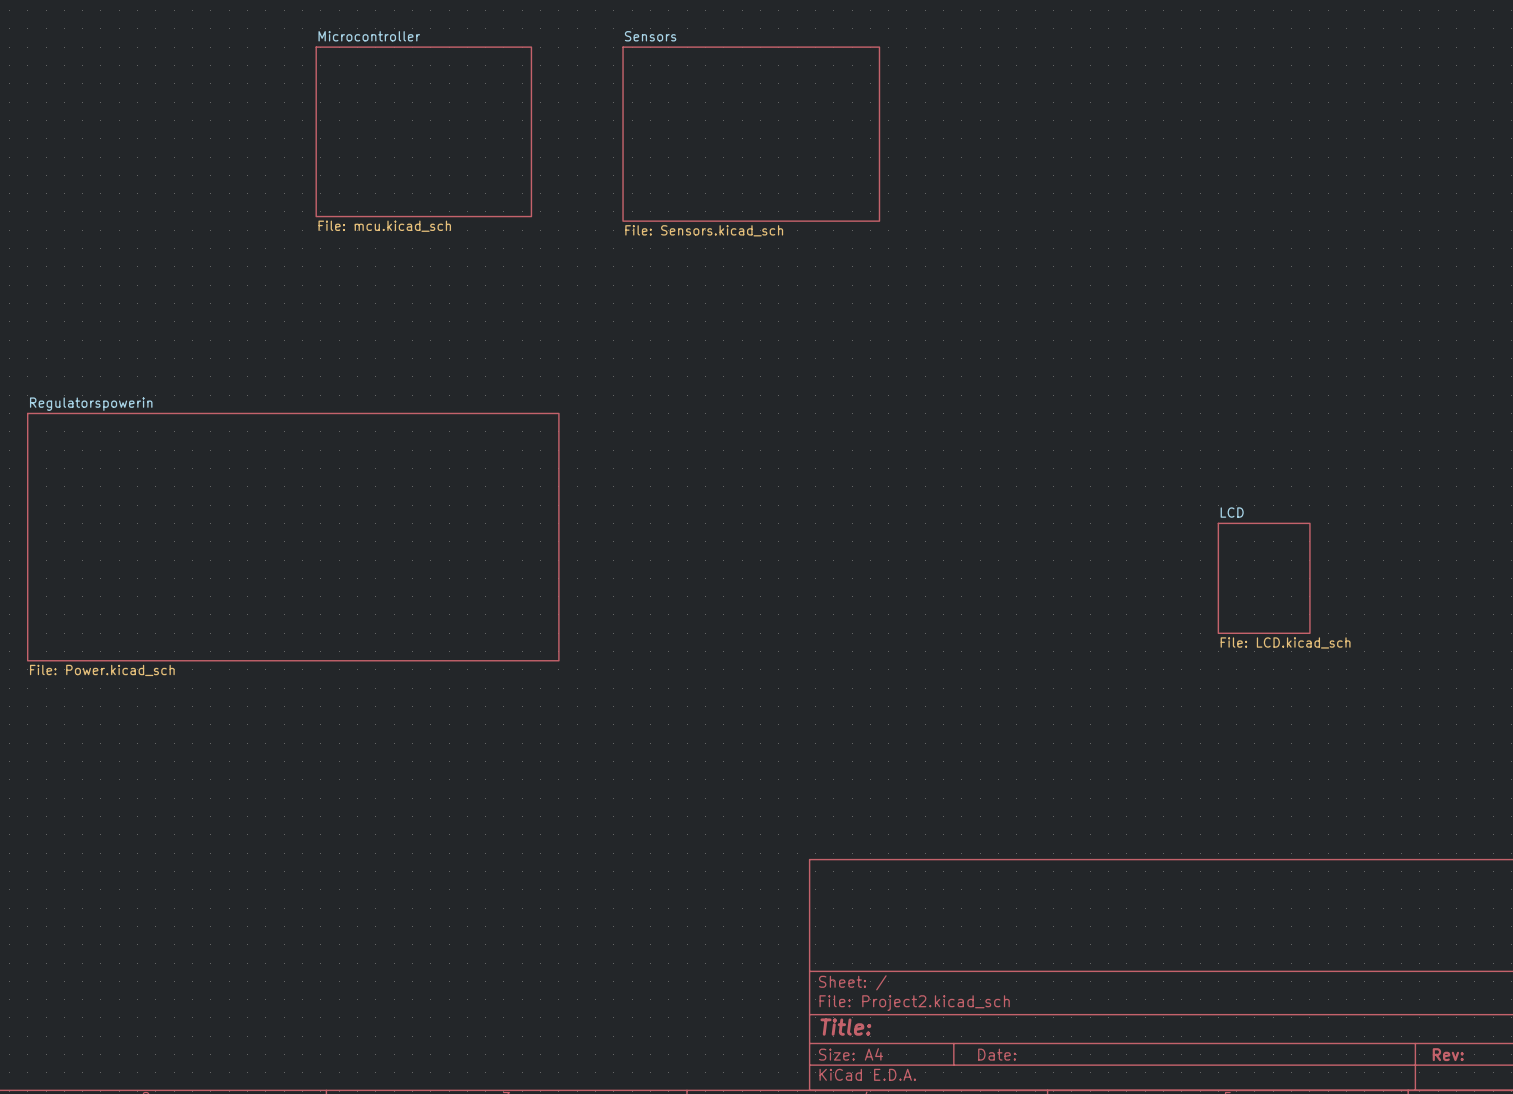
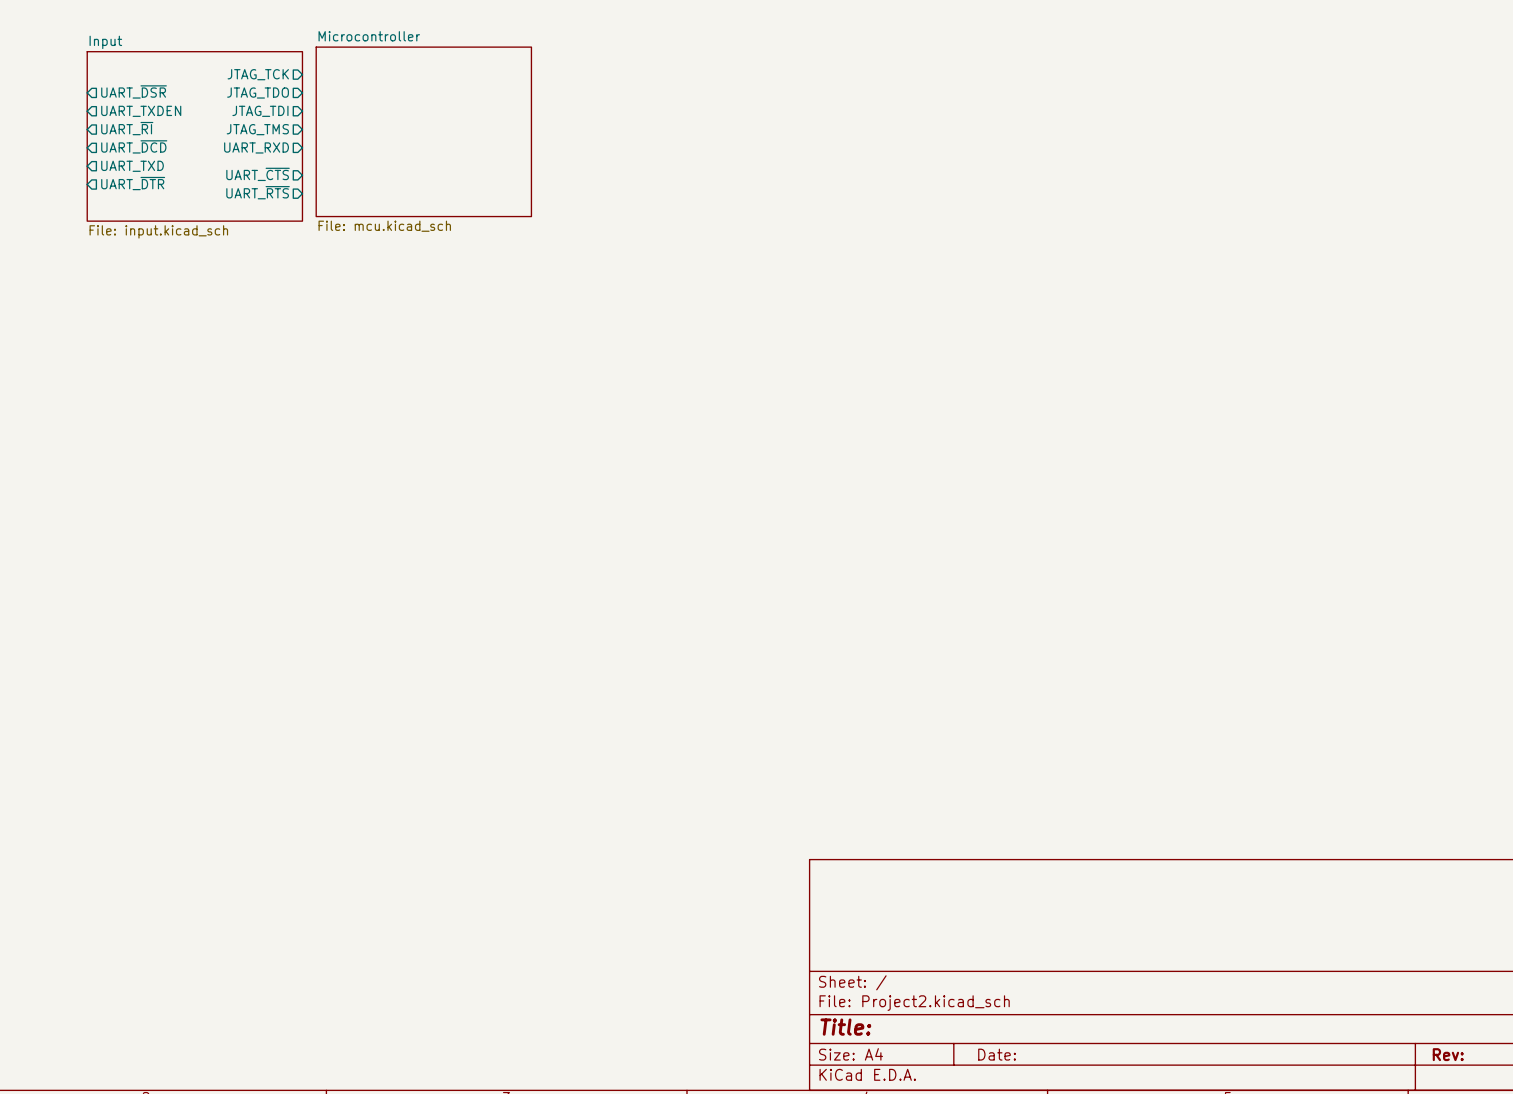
sheet pin: none -> JTAG_TCK (258, 74)
sheet pin: none -> UART_~{DSR} (134, 91)
sheet pin: none -> JTAG_TDO (258, 93)
sheet pin: none -> UART_TXDEN (141, 111)
sheet pin: none -> JTAG_TDI (260, 111)
sheet pin: none -> UART_~{RI} (127, 128)
sheet pin: none -> JTAG_TMS (257, 129)
sheet Sensors: File: Sensors.kicad_sch (751, 134) -> none
sheet Input: none -> File: input.kicad_sch (194, 136)
sheet pin: none -> UART_~{DCD} (134, 146)
sheet pin: none -> UART_RXD (256, 147)
sheet pin: none -> UART_TXD (132, 166)
sheet pin: none -> UART_~{CTS} (258, 174)
sheet pin: none -> UART_~{DTR} (133, 183)
sheet pin: none -> UART_~{RTS} (258, 192)
sheet Regulatorspowerin: File: Power.kicad_sch (293, 537) -> none
sheet LCD: File: LCD.kicad_sch (1264, 578) -> none

